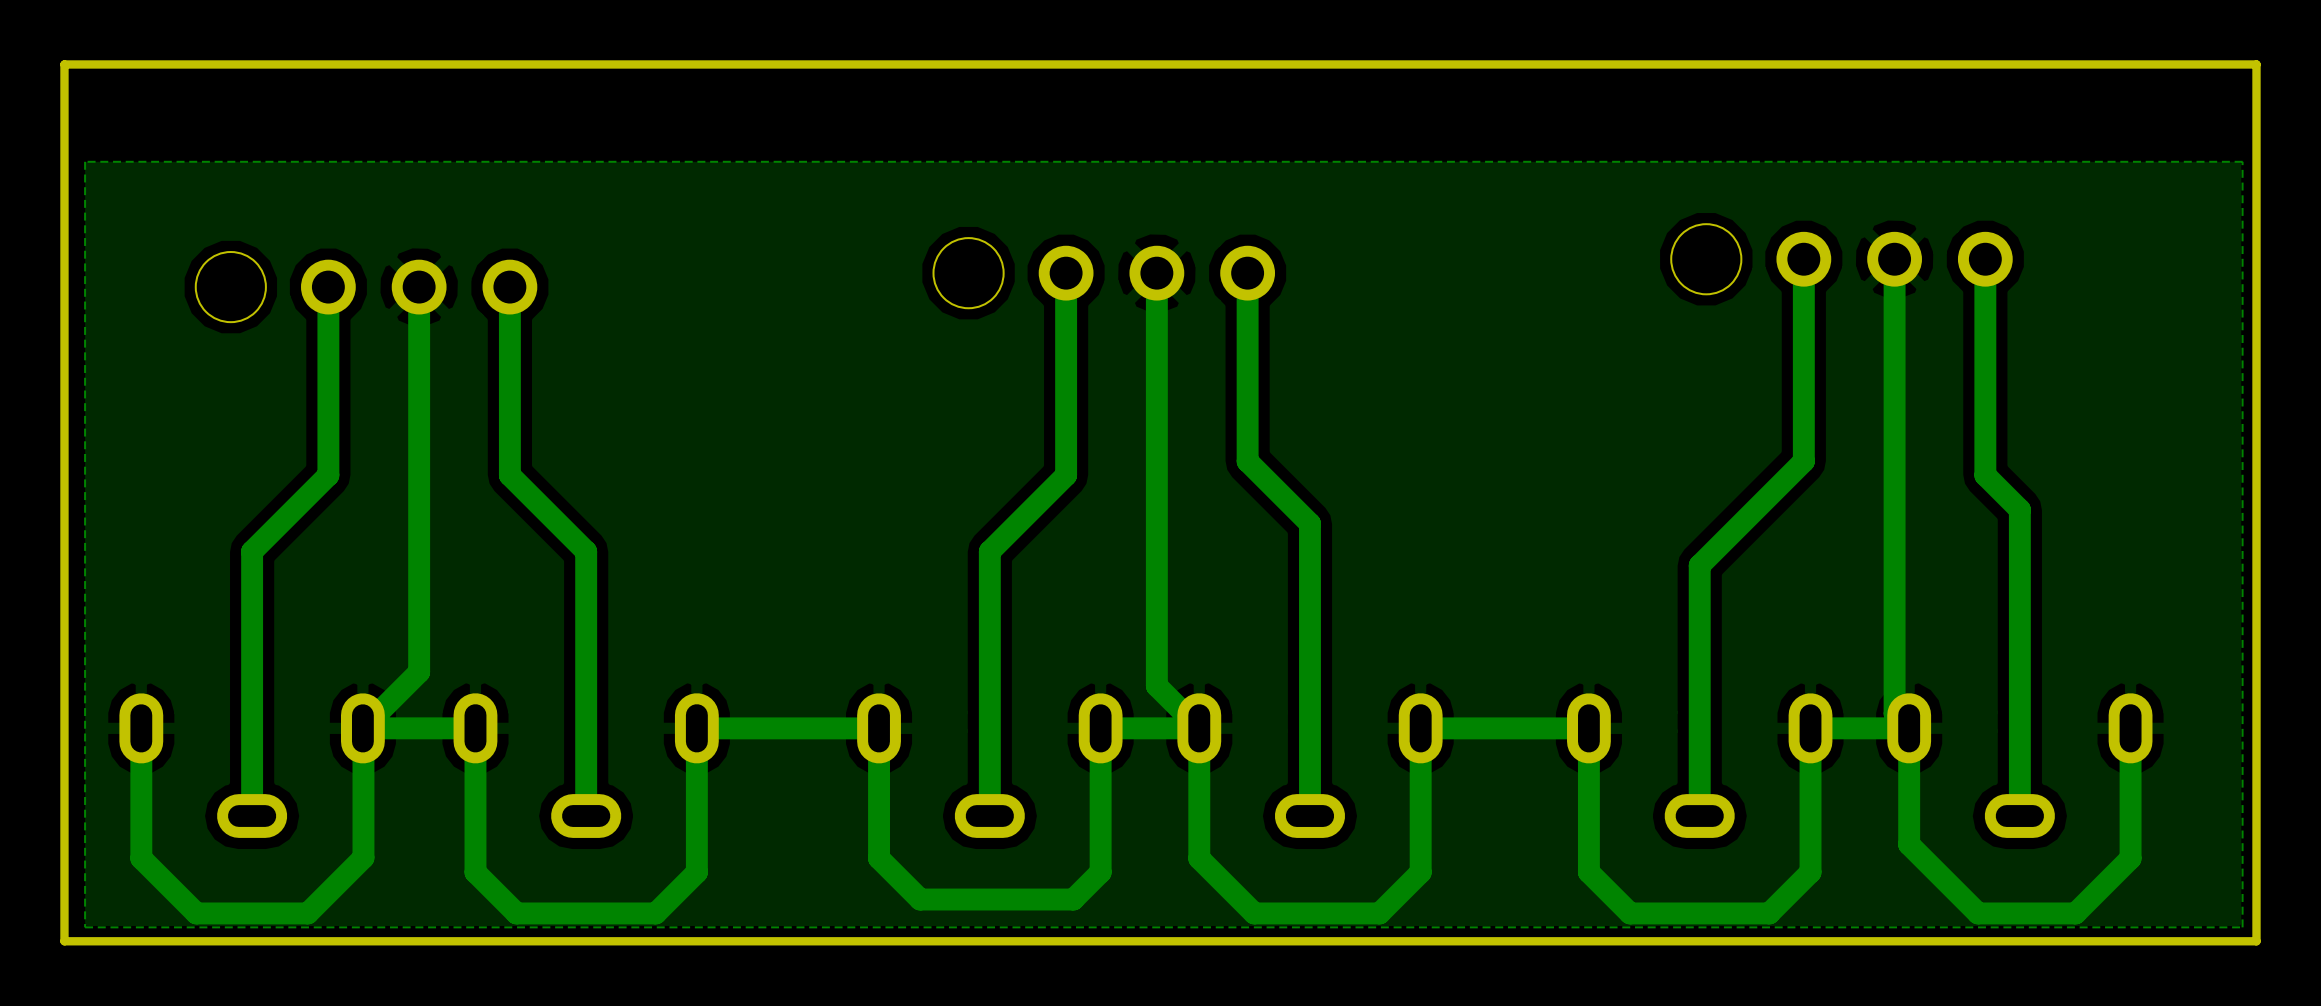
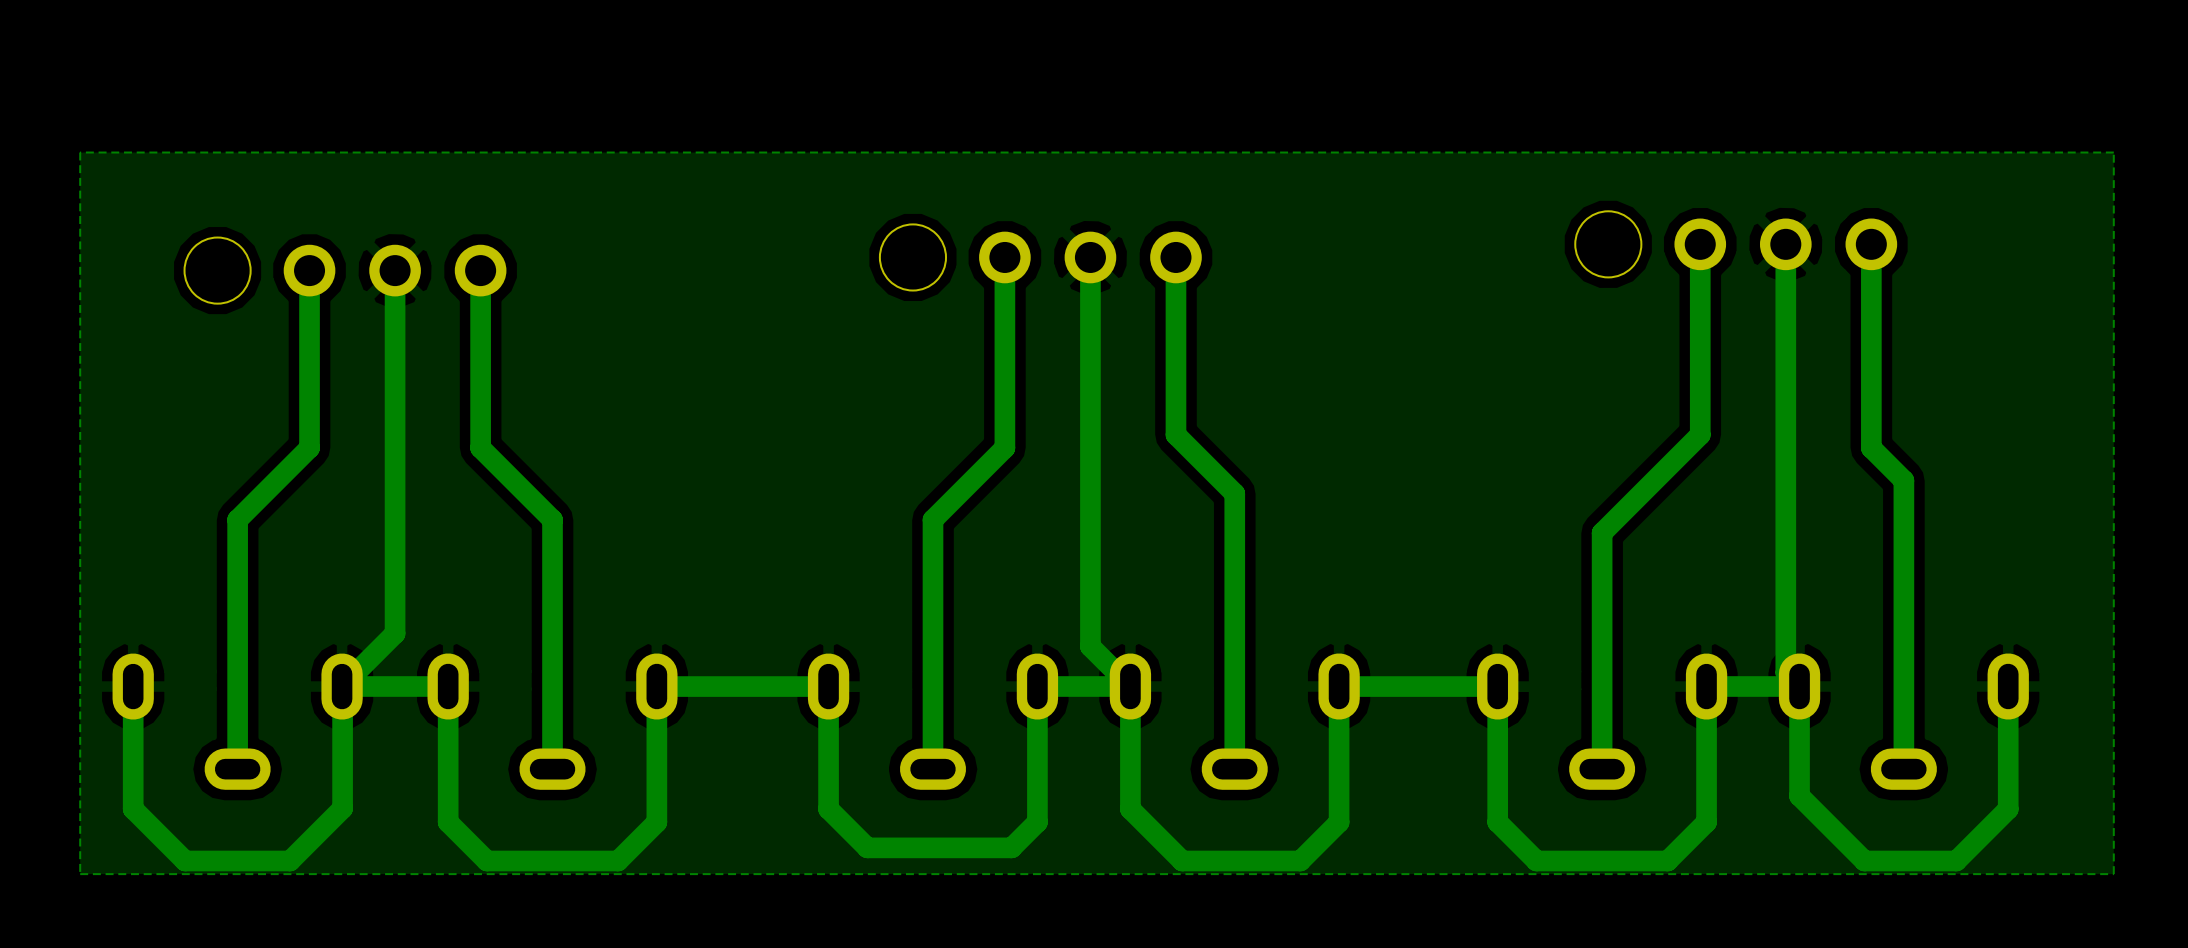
drawing: [60, 60, 2261, 946] -> none

